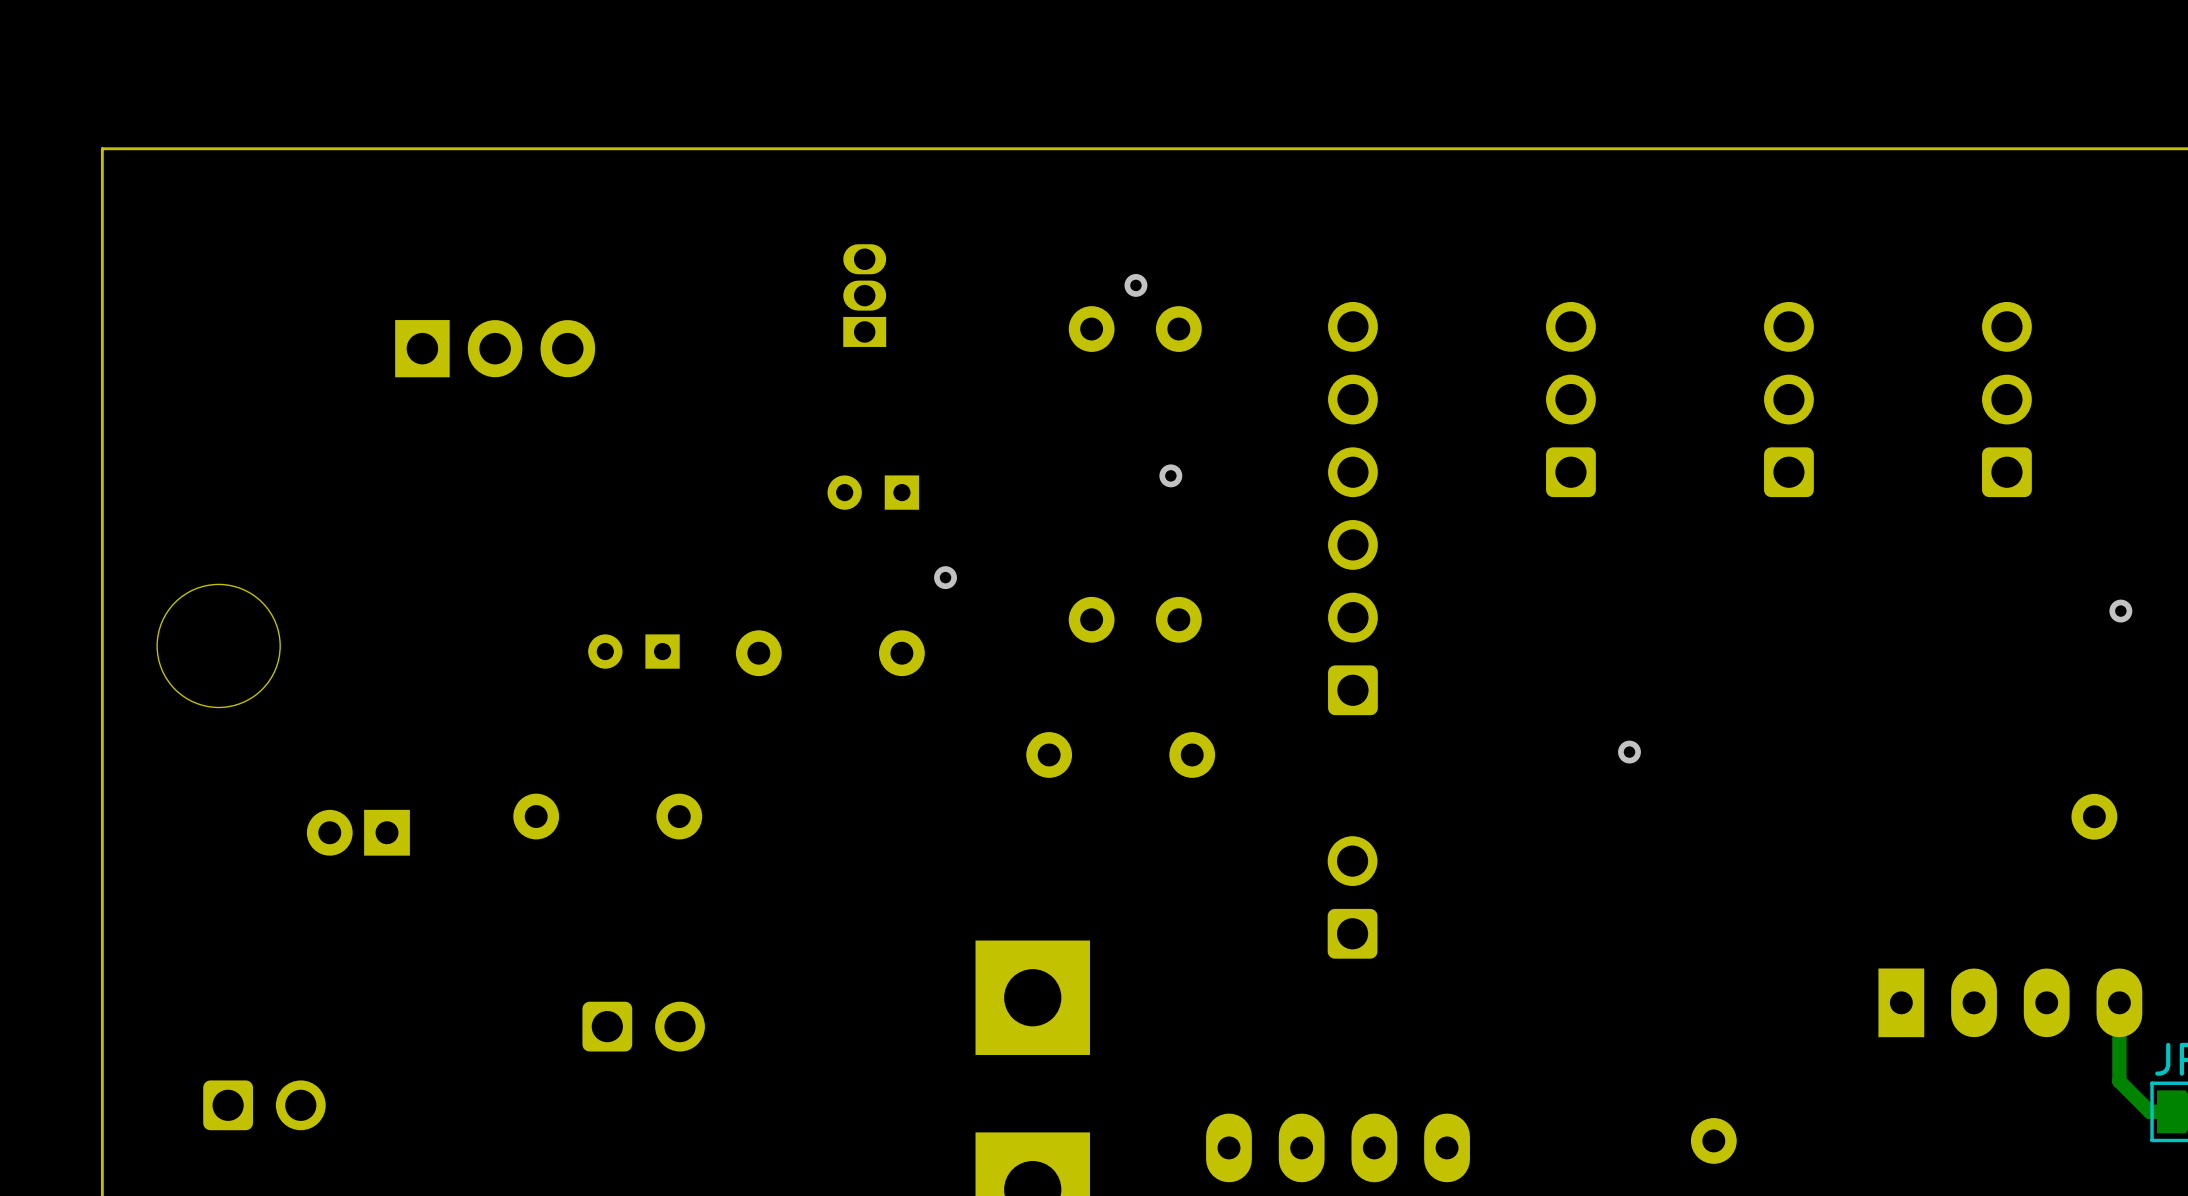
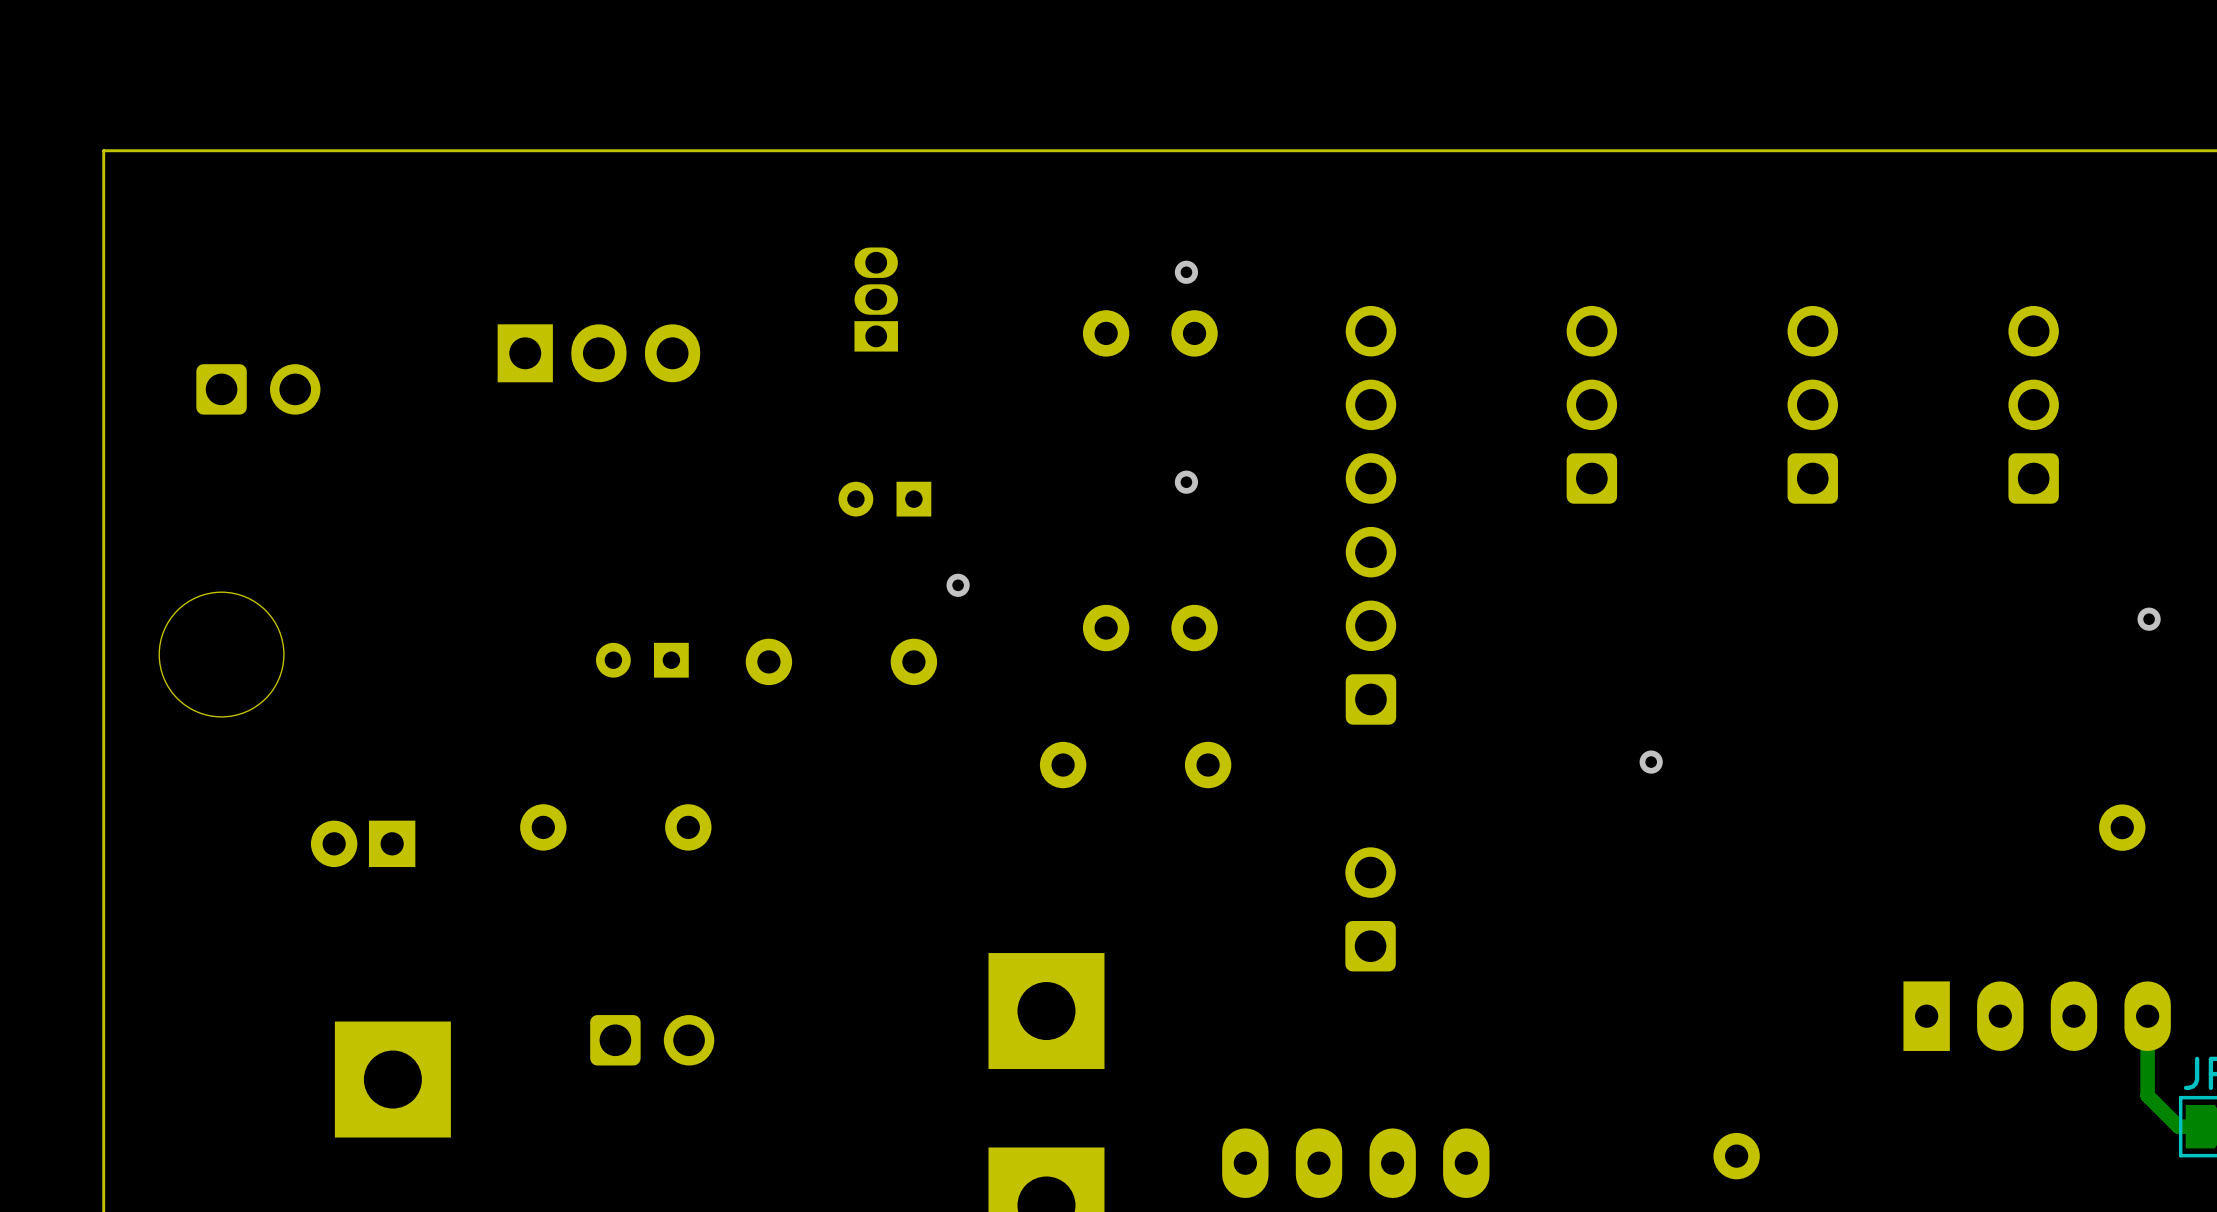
via position: (1135, 285) -> (1186, 272)
part position: (495, 348) -> (598, 353)
part: none -> (258, 389)
part: none -> (392, 1079)
part: (264, 1105) -> none

